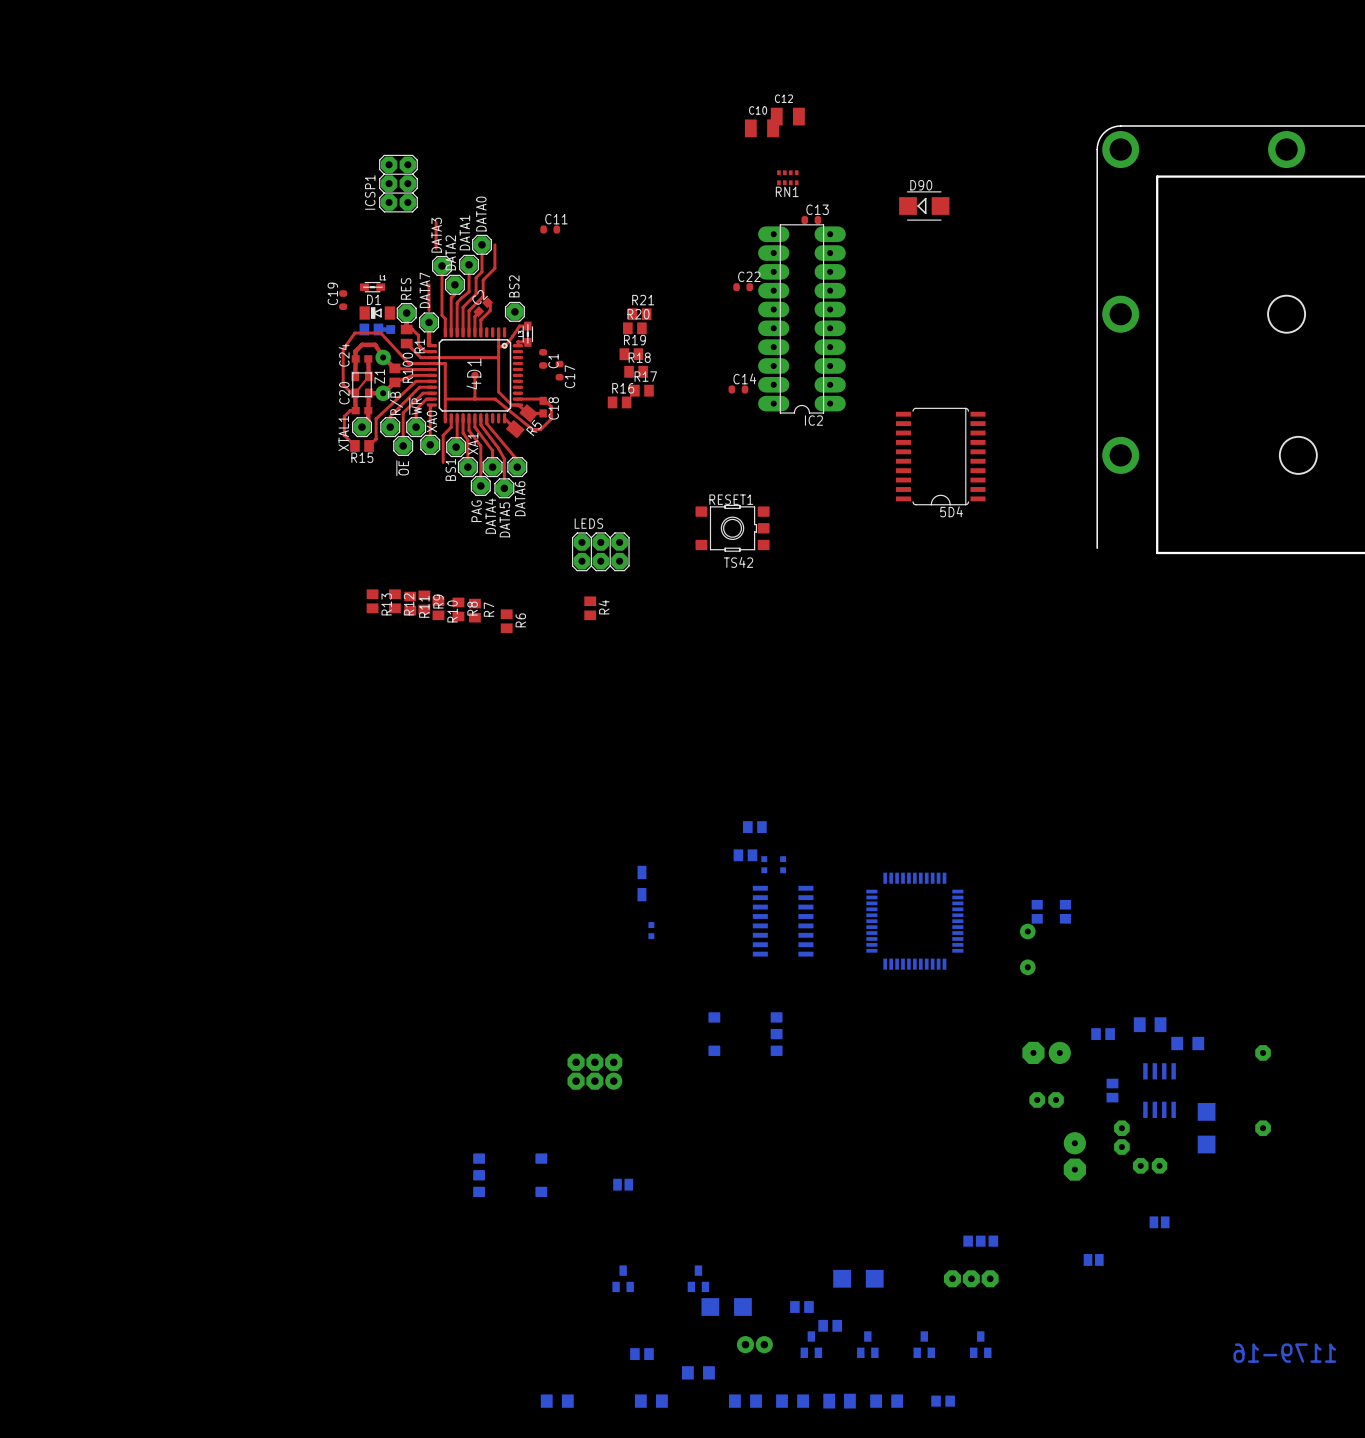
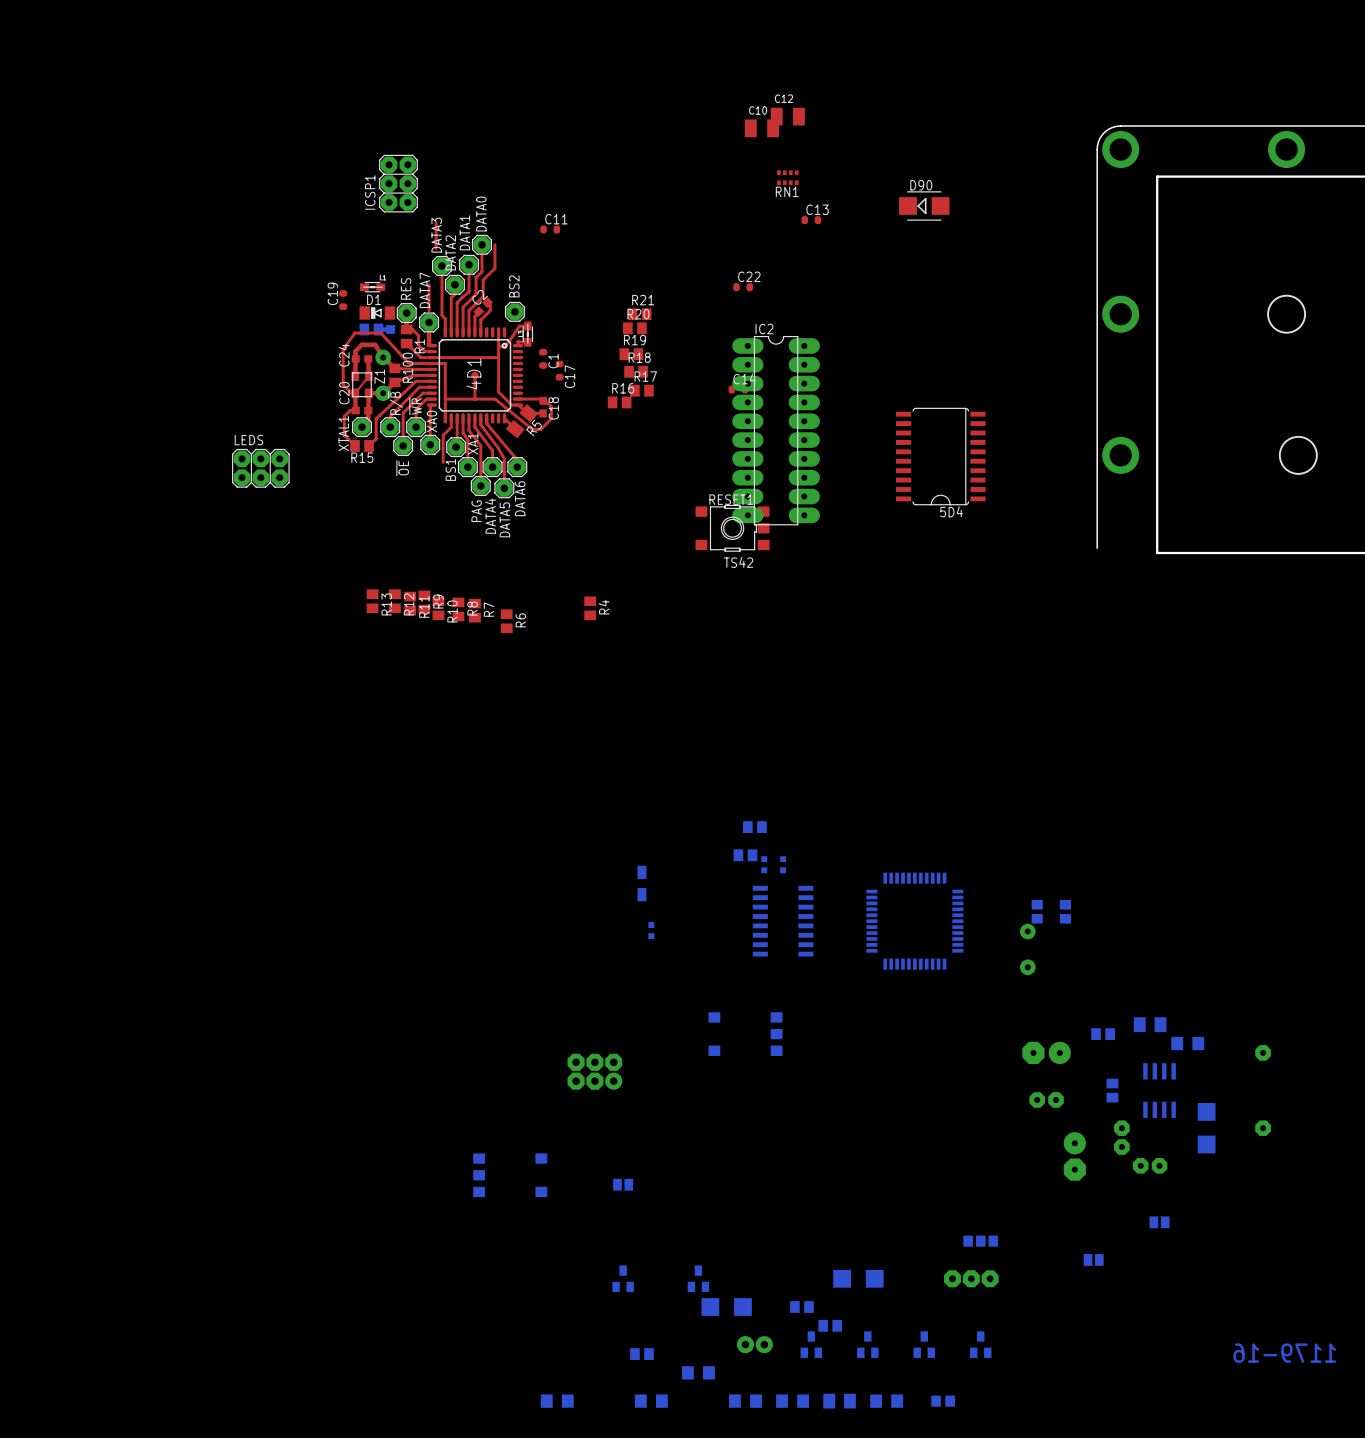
IC2 footprint: [758, 224, 846, 414] -> [732, 335, 820, 526]
IC2 name position: IC2 (813, 420) -> IC2 (764, 329)
LEDS: none -> (260, 468)
LEDS: (600, 551) -> none

